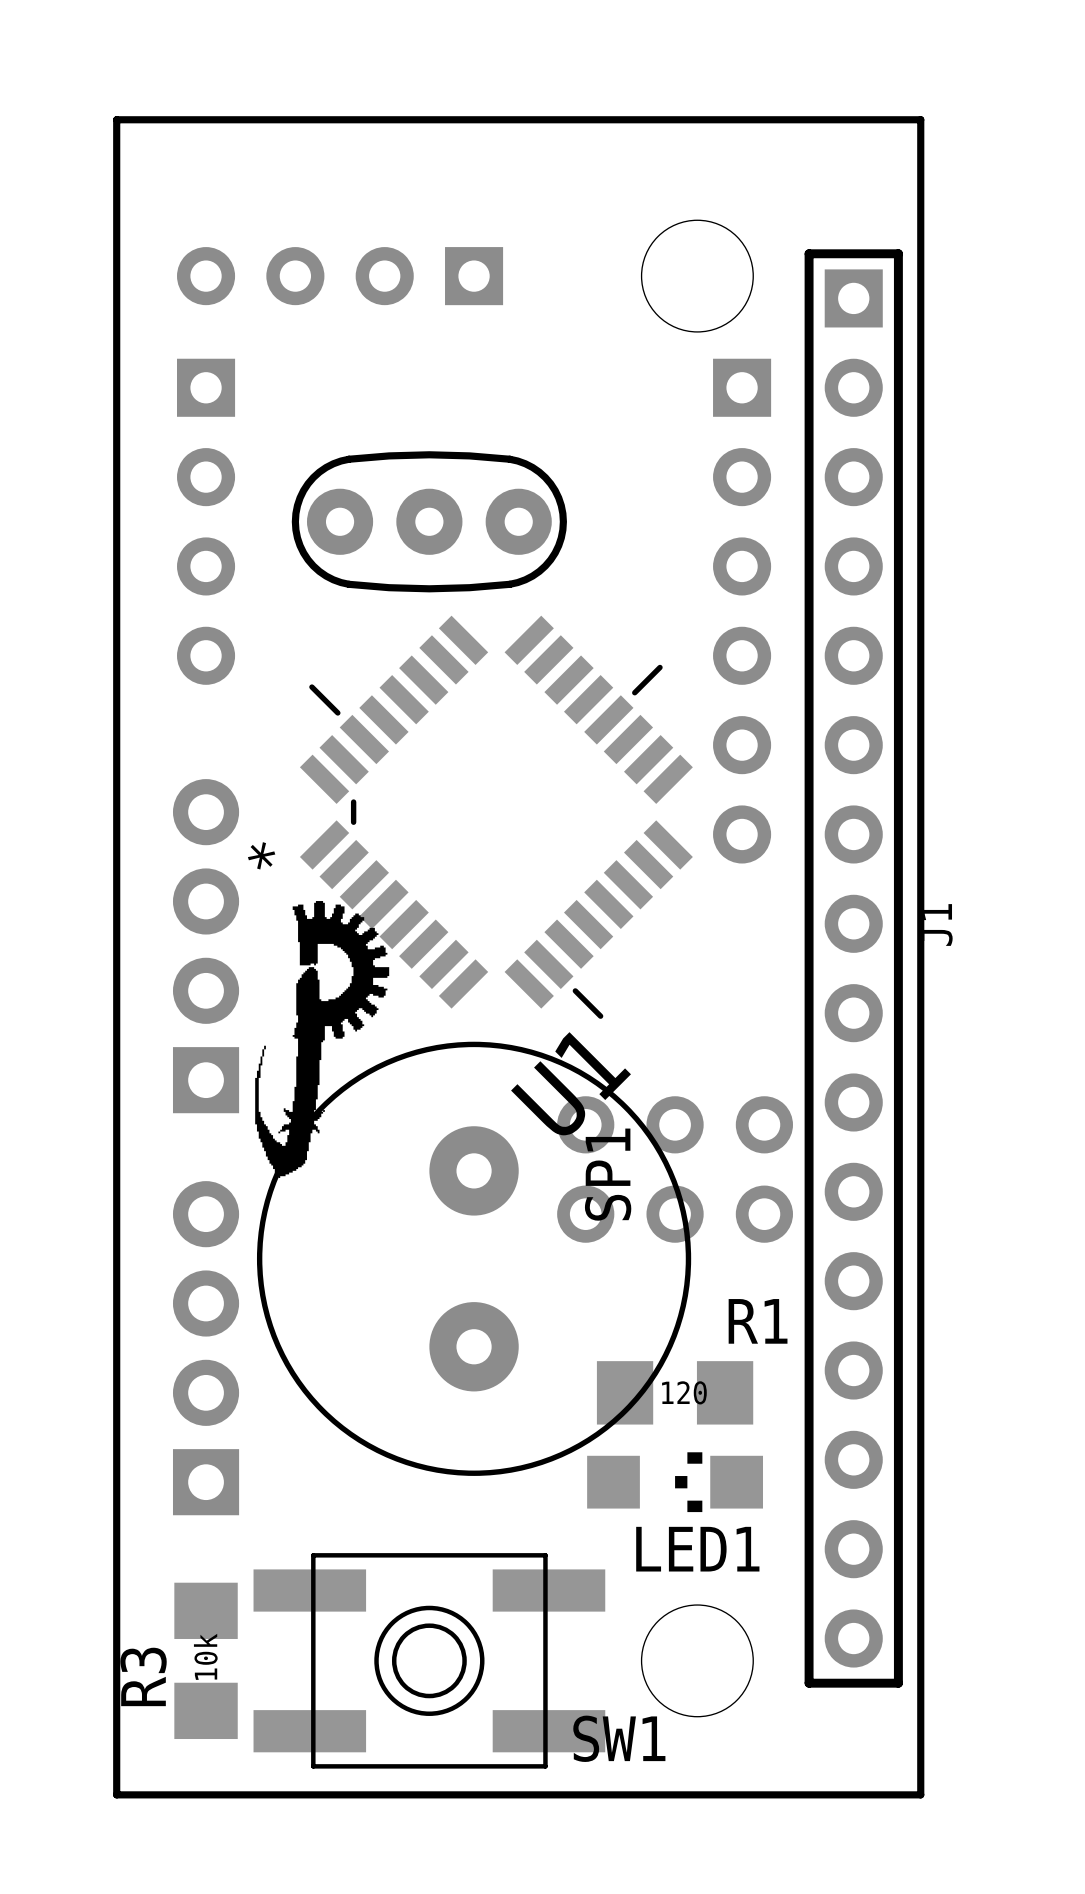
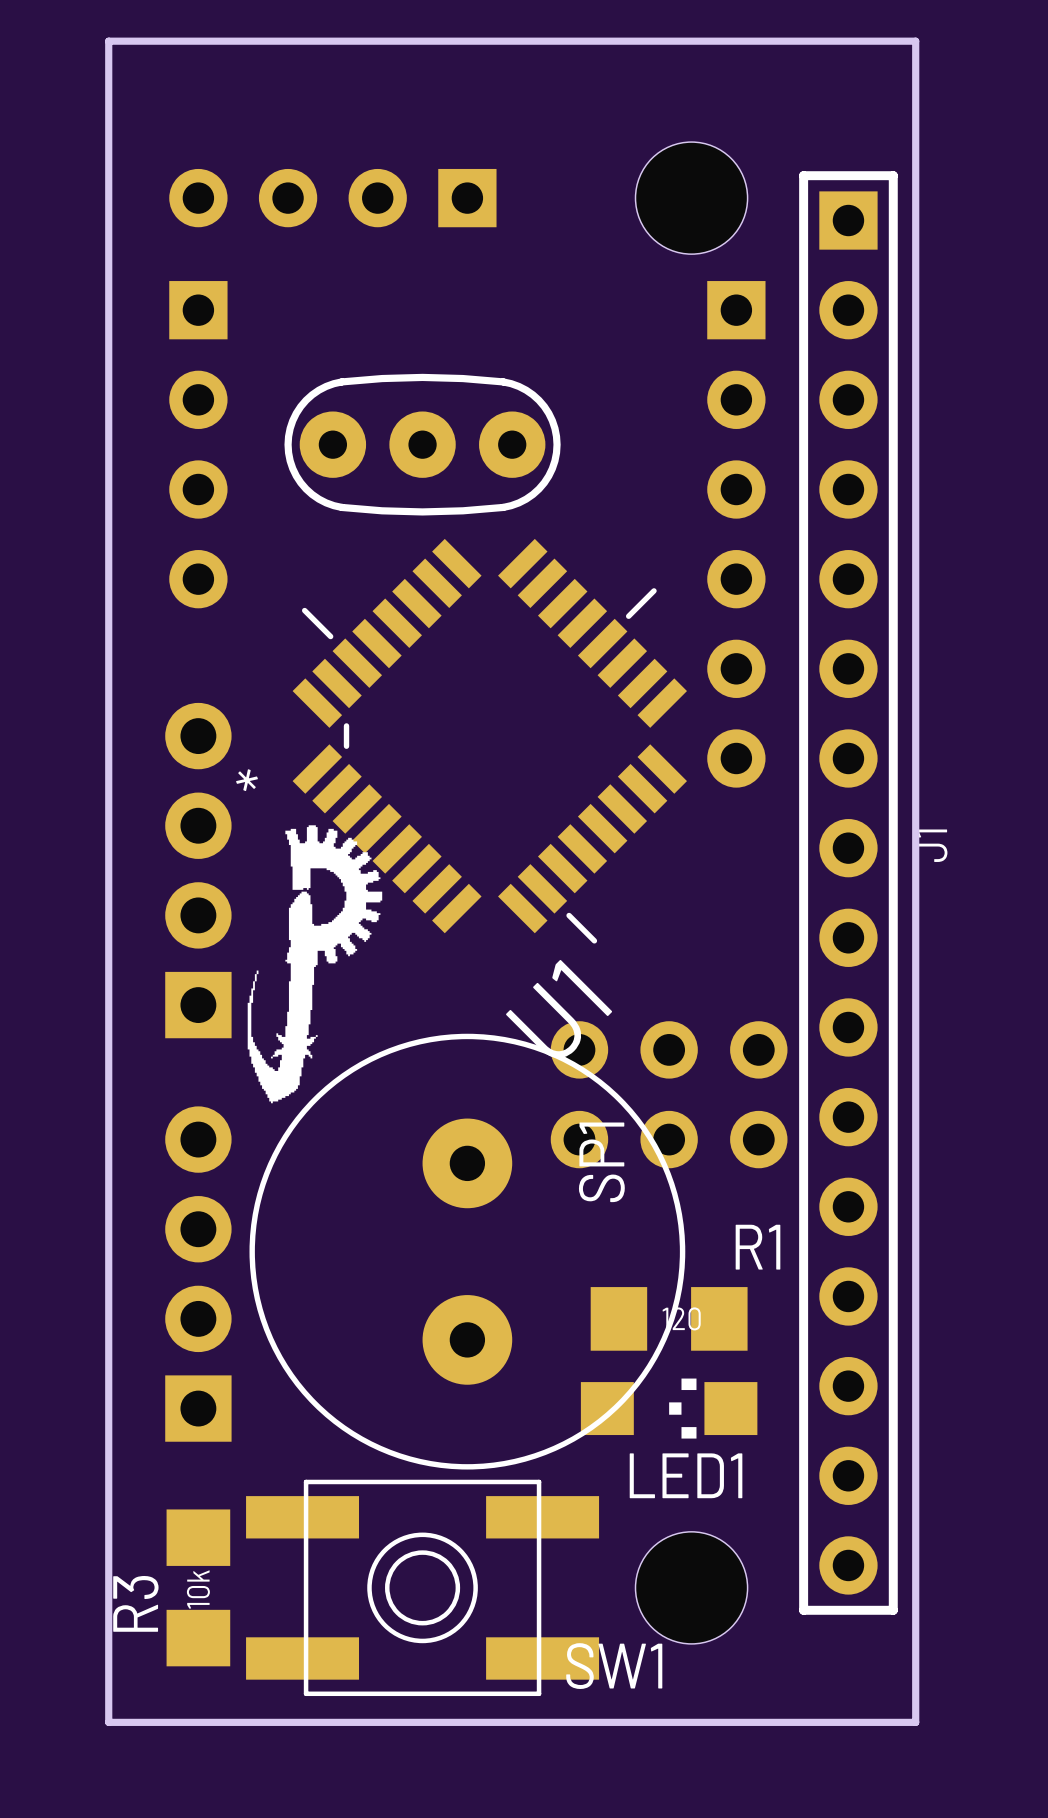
SP1 position: (474, 1258) -> (467, 1251)

